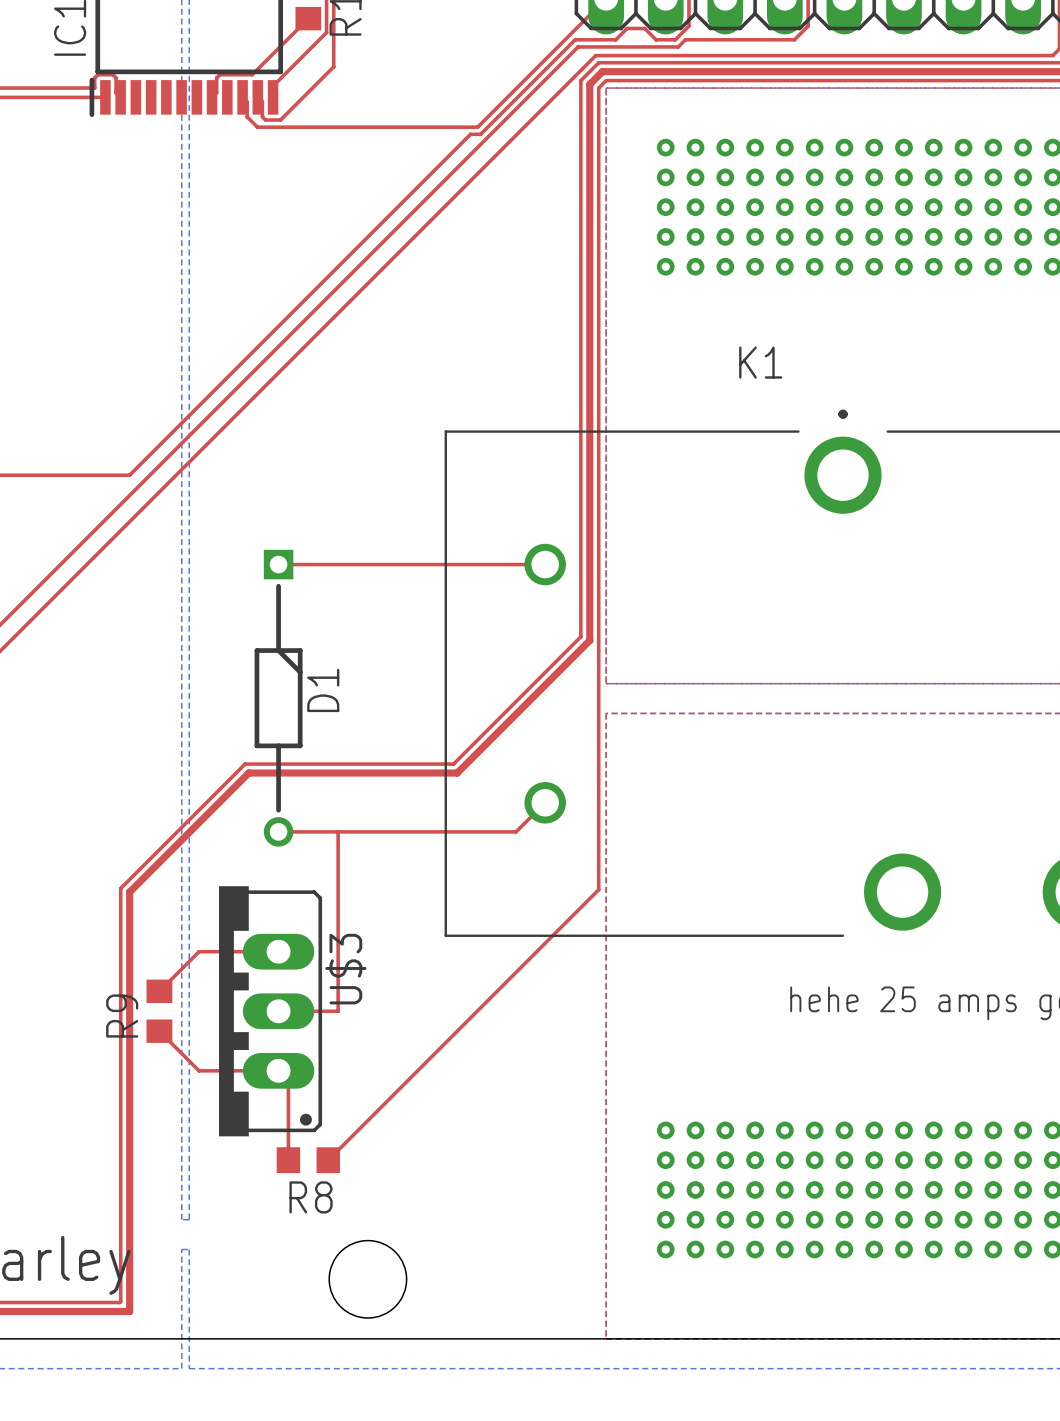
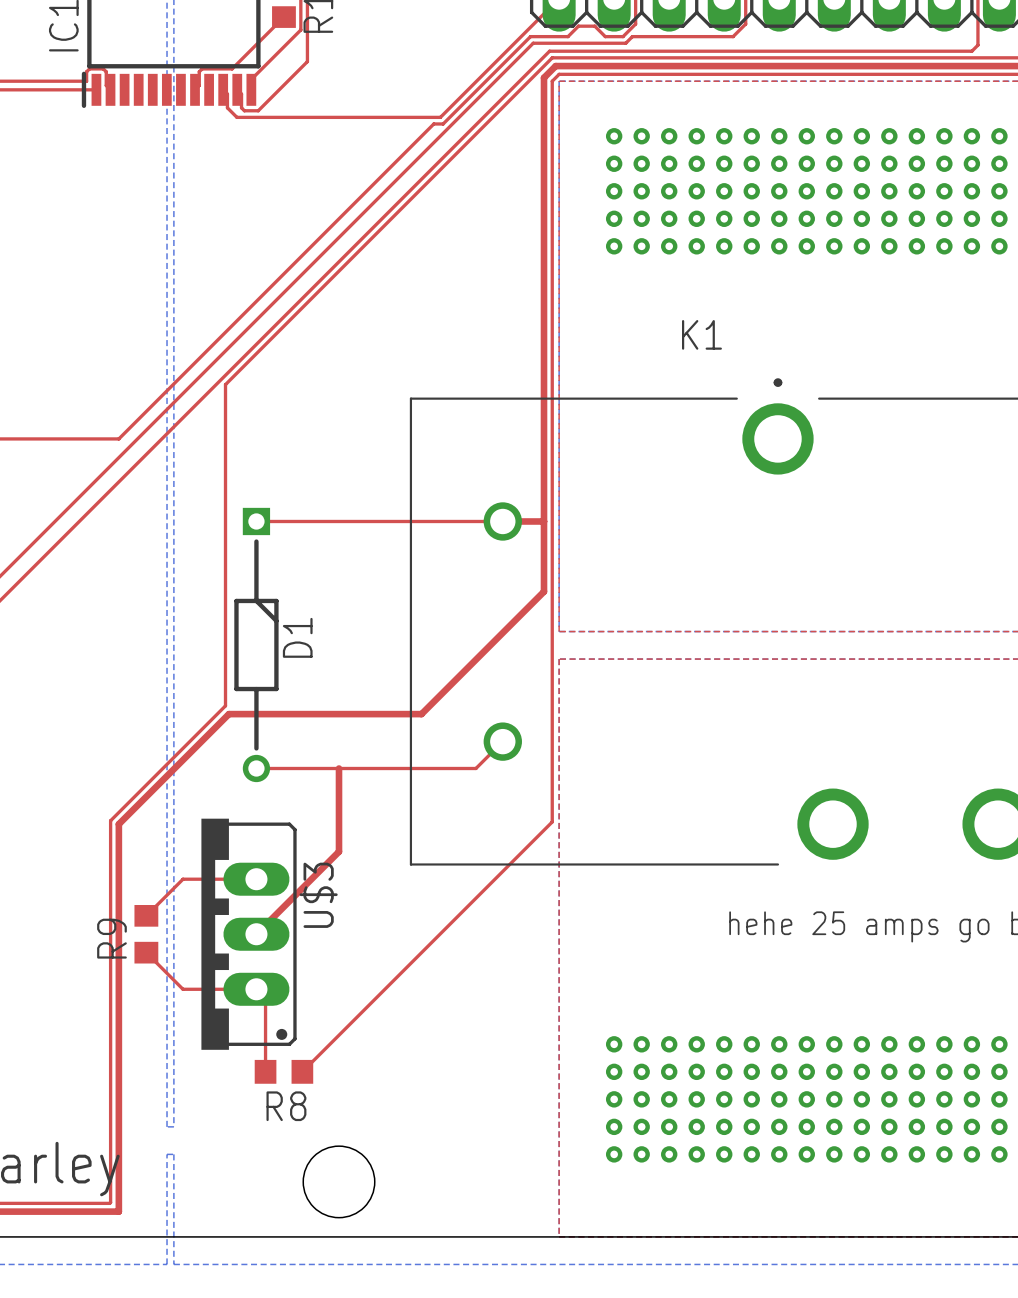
top track: (580, 80) (580, 636) (453, 764) (245, 764) -> (535, 74) (225, 384) (225, 705)
top track: none -> (502, 521) (544, 521)
top track: (338, 831) (338, 1011) (278, 1011) -> (339, 768) (339, 851) (256, 934)

